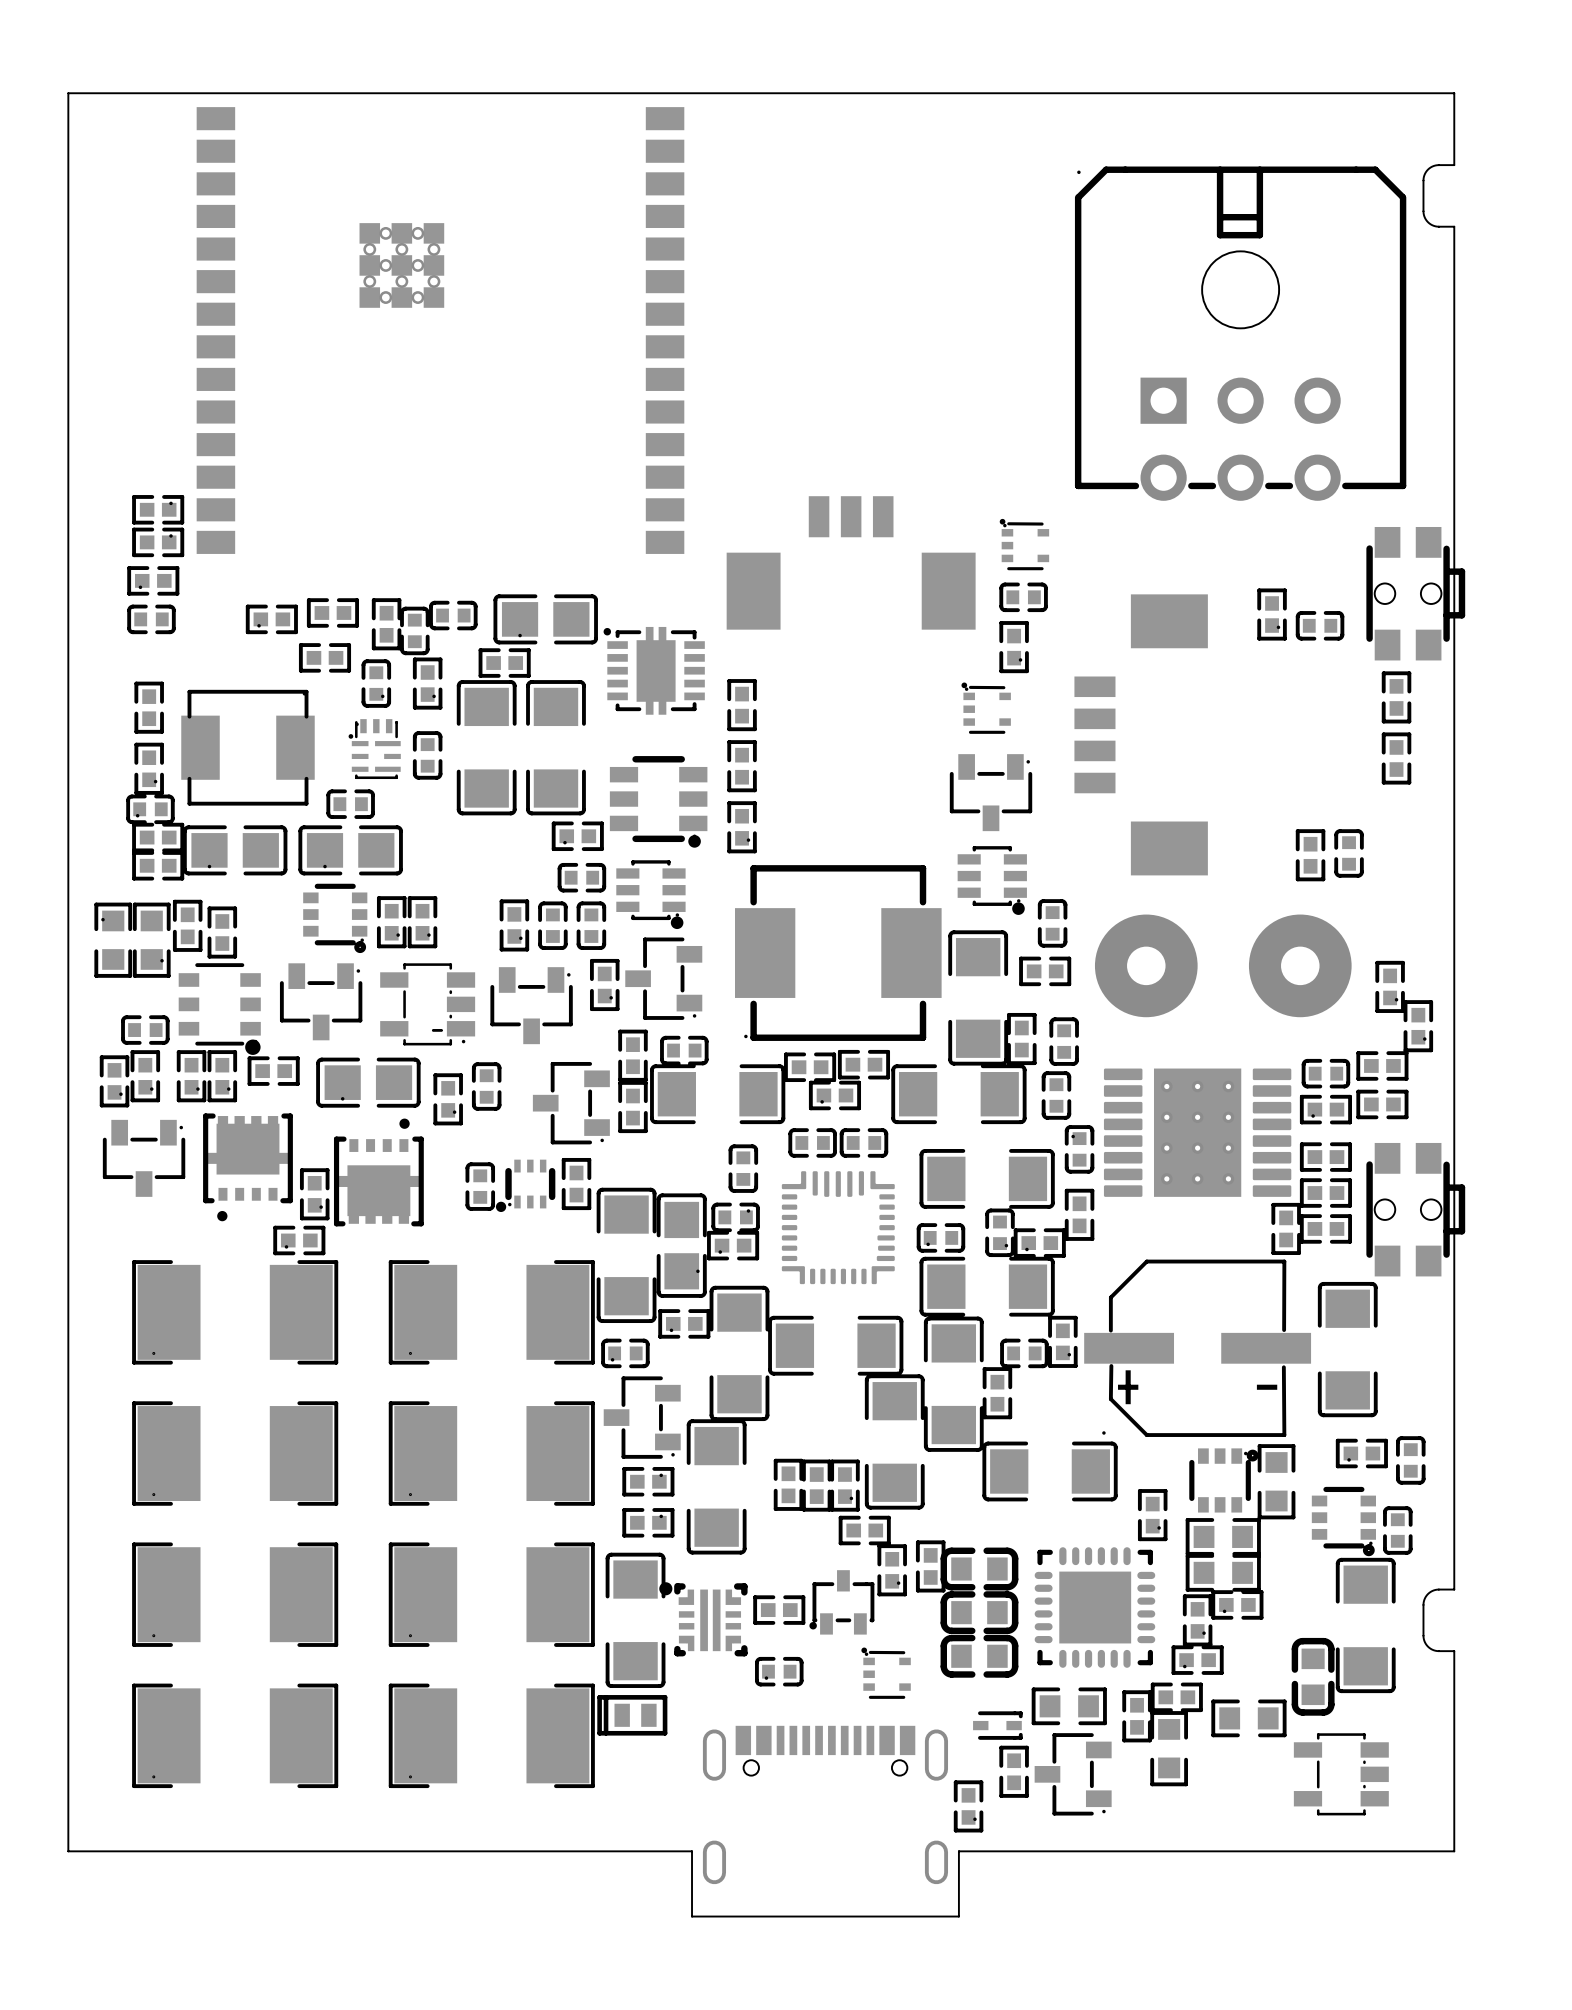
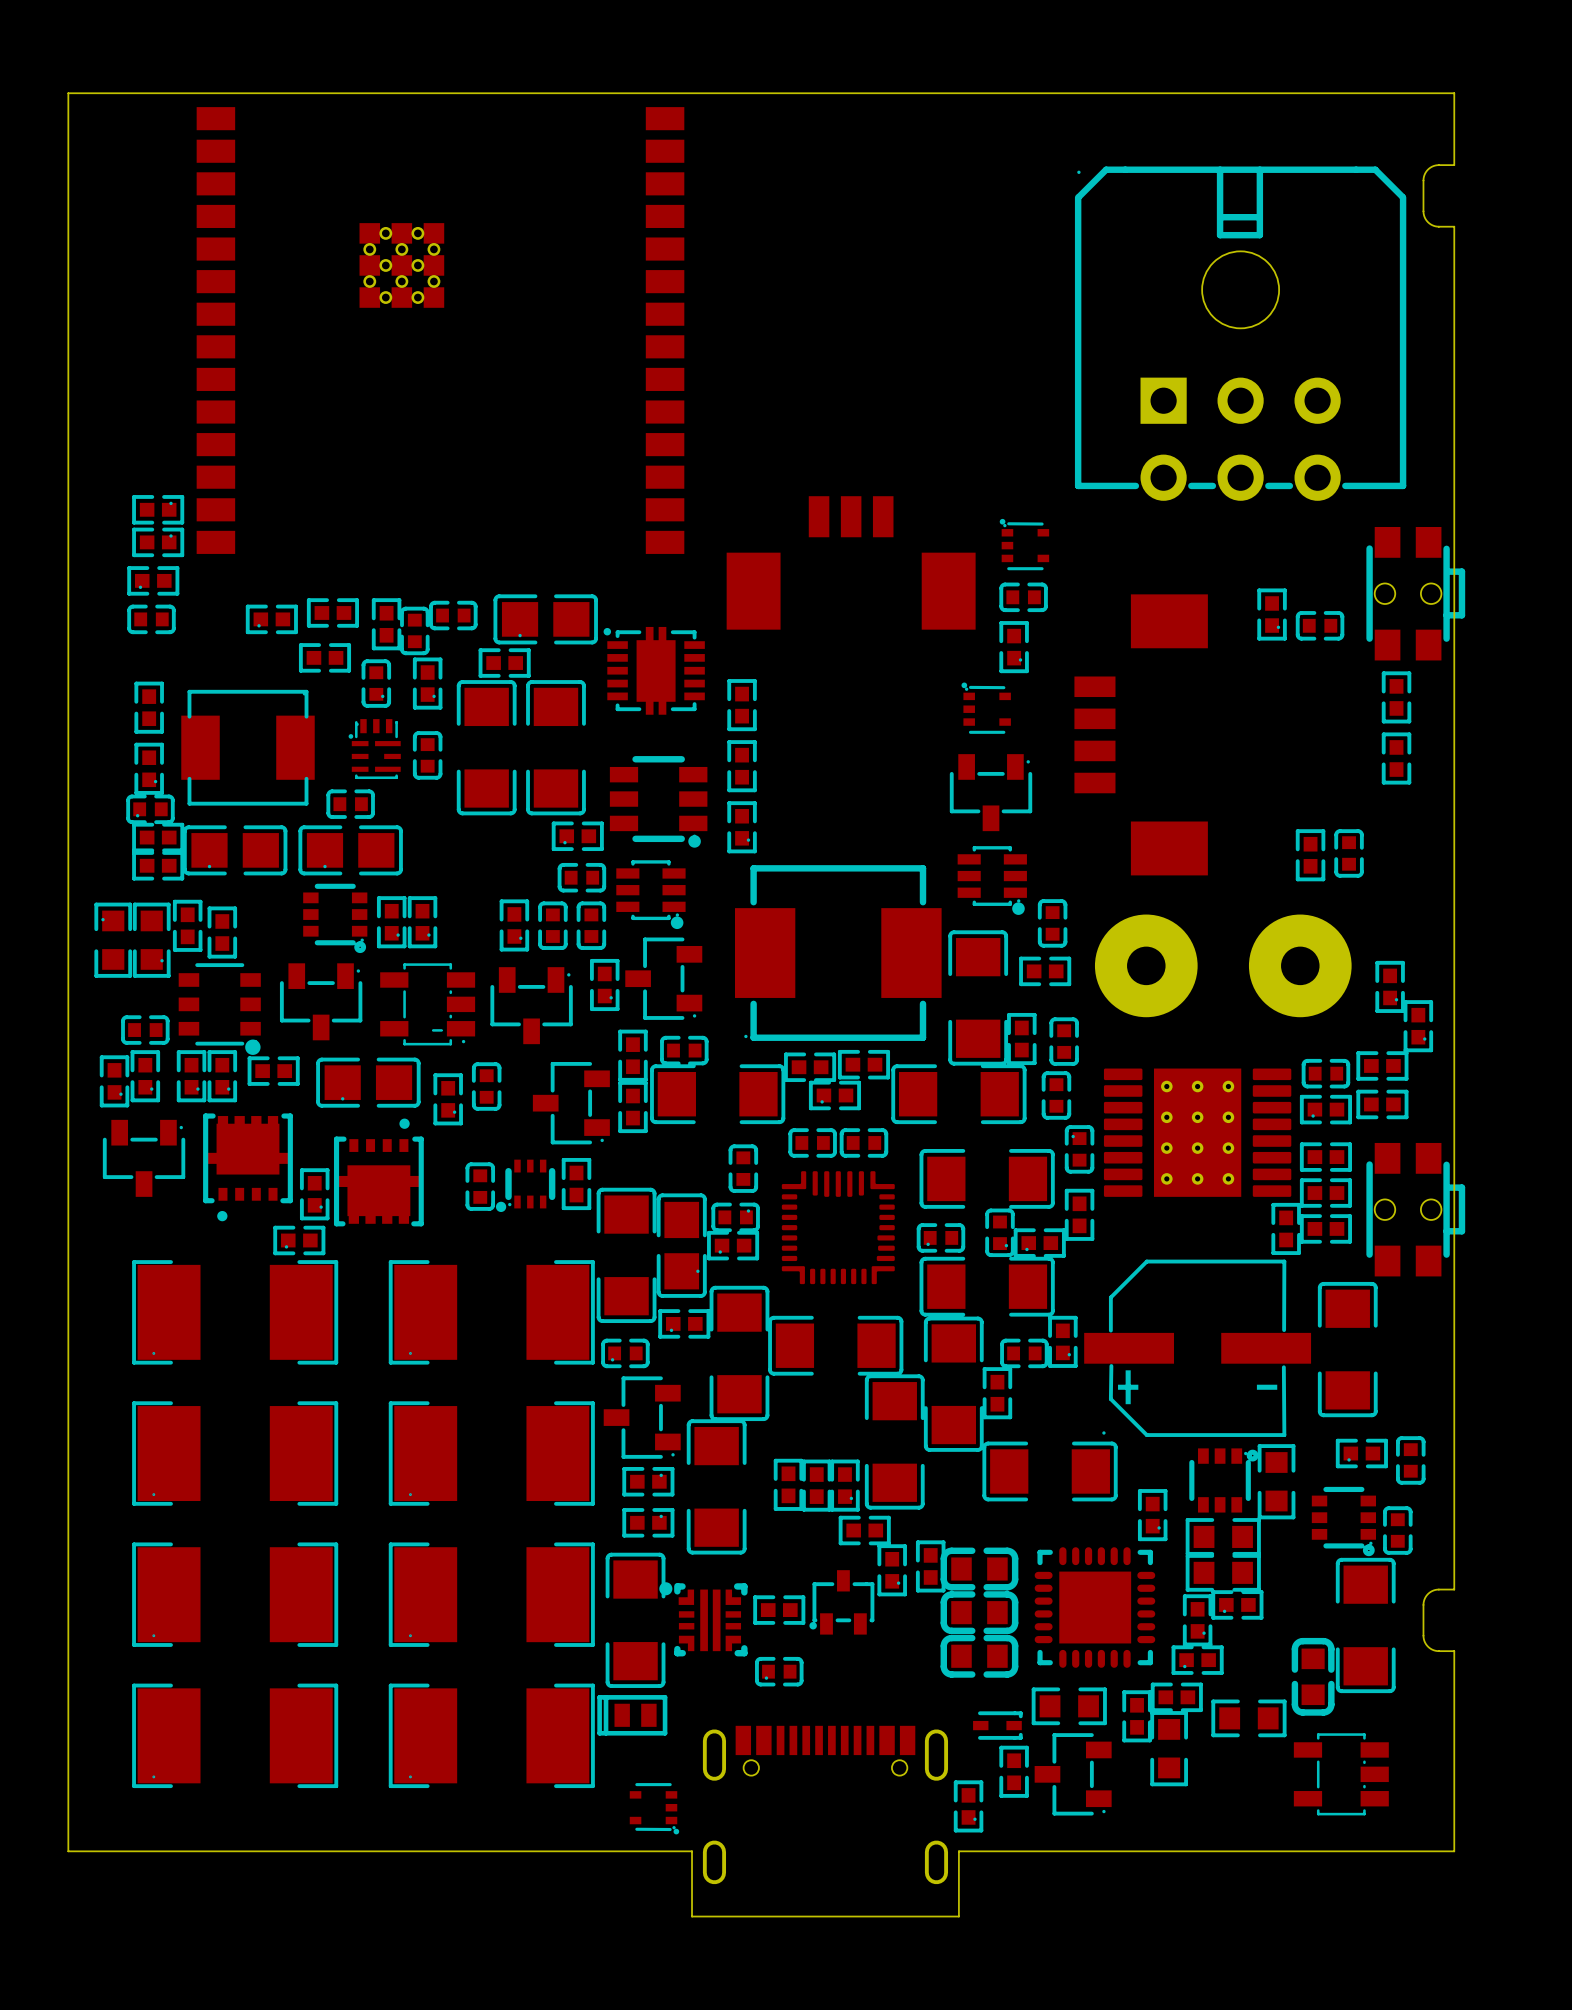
part rotation: 0° (886, 1673) -> 180° (654, 1808)
part position: (886, 1673) -> (654, 1808)

